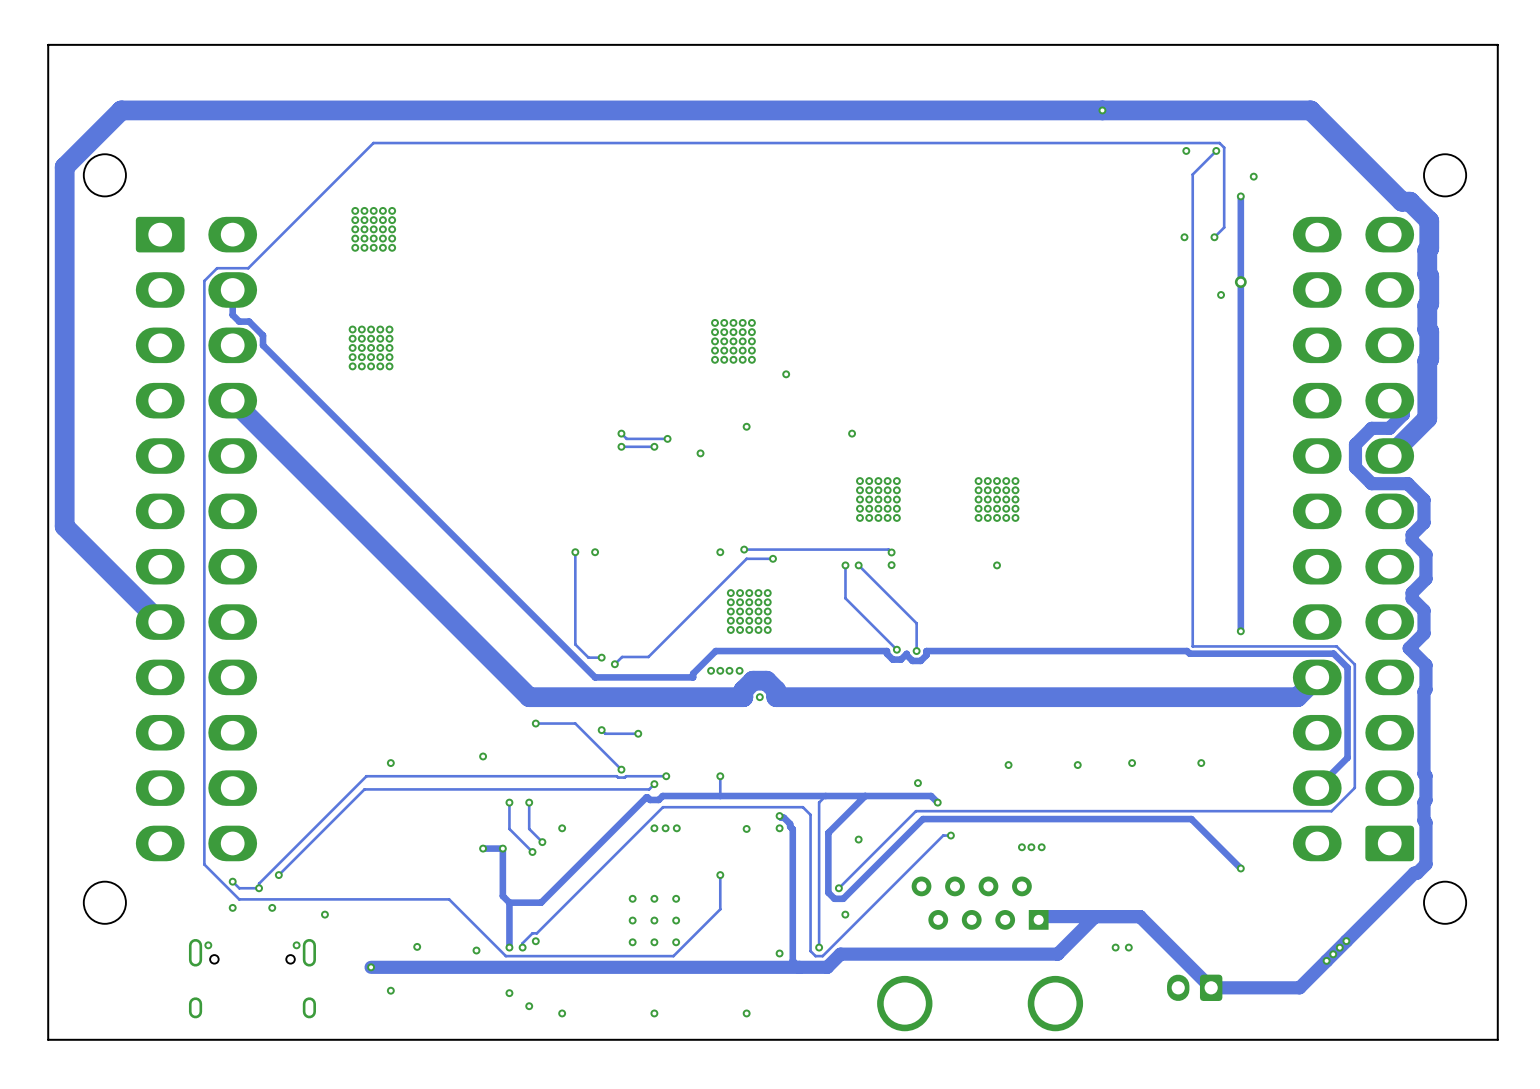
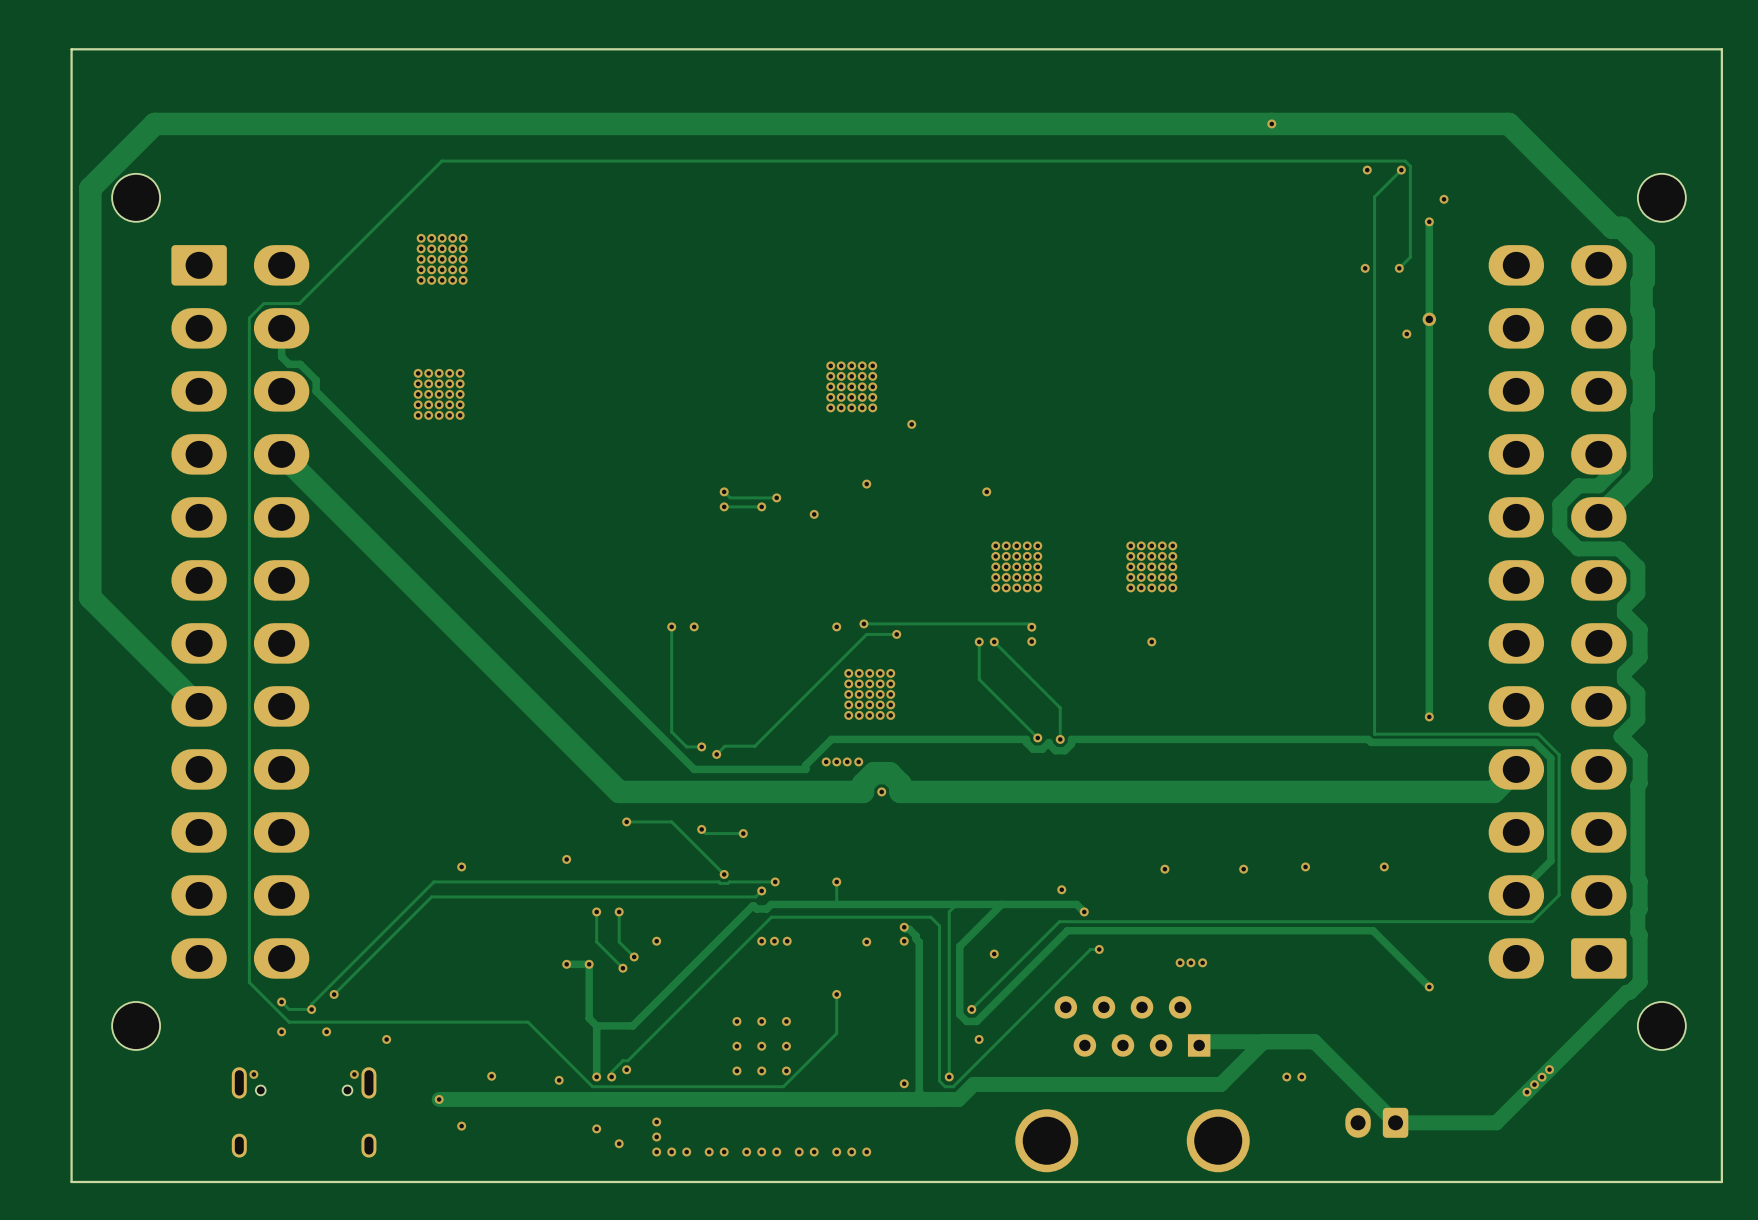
via: none -> (656, 1121)
via: none -> (656, 1136)
via: none -> (671, 1151)
via: none -> (686, 1151)
via: none -> (709, 1151)
via: none -> (724, 1151)
via: none -> (746, 1151)
via: none -> (776, 1151)
via: none -> (799, 1151)
via: none -> (814, 1151)
via: none -> (836, 1151)
via: none -> (851, 1151)

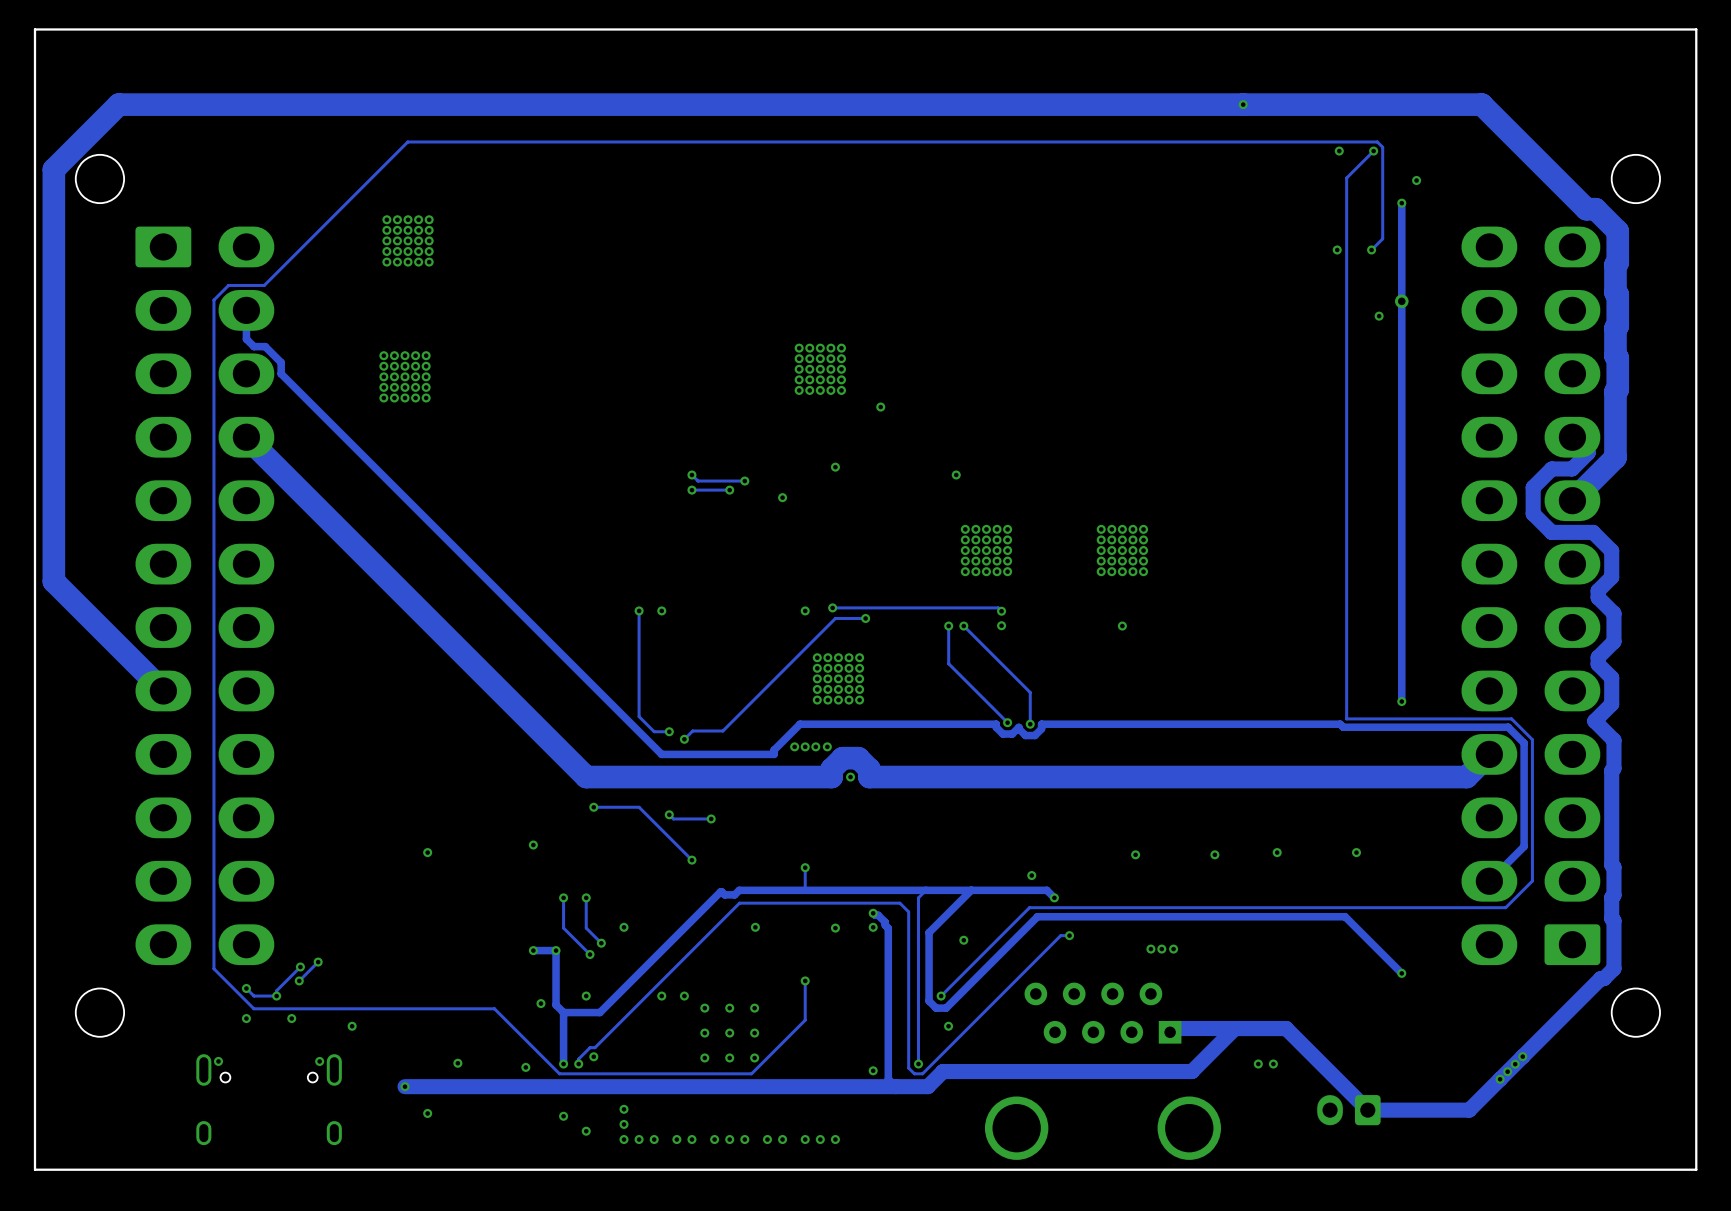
track: (775, 881) (727, 883) (433, 881) (335, 980) -> none
via: (775, 881) -> none
track: (761, 890) (755, 896) (431, 896) (352, 975) -> none
via: (761, 890) -> none
via: (761, 941) -> none
via: (774, 941) -> none
via: none -> (318, 962)
via: none -> (300, 966)
via: none -> (586, 996)
via: none -> (661, 996)
via: none -> (684, 996)
via: none -> (540, 1003)

